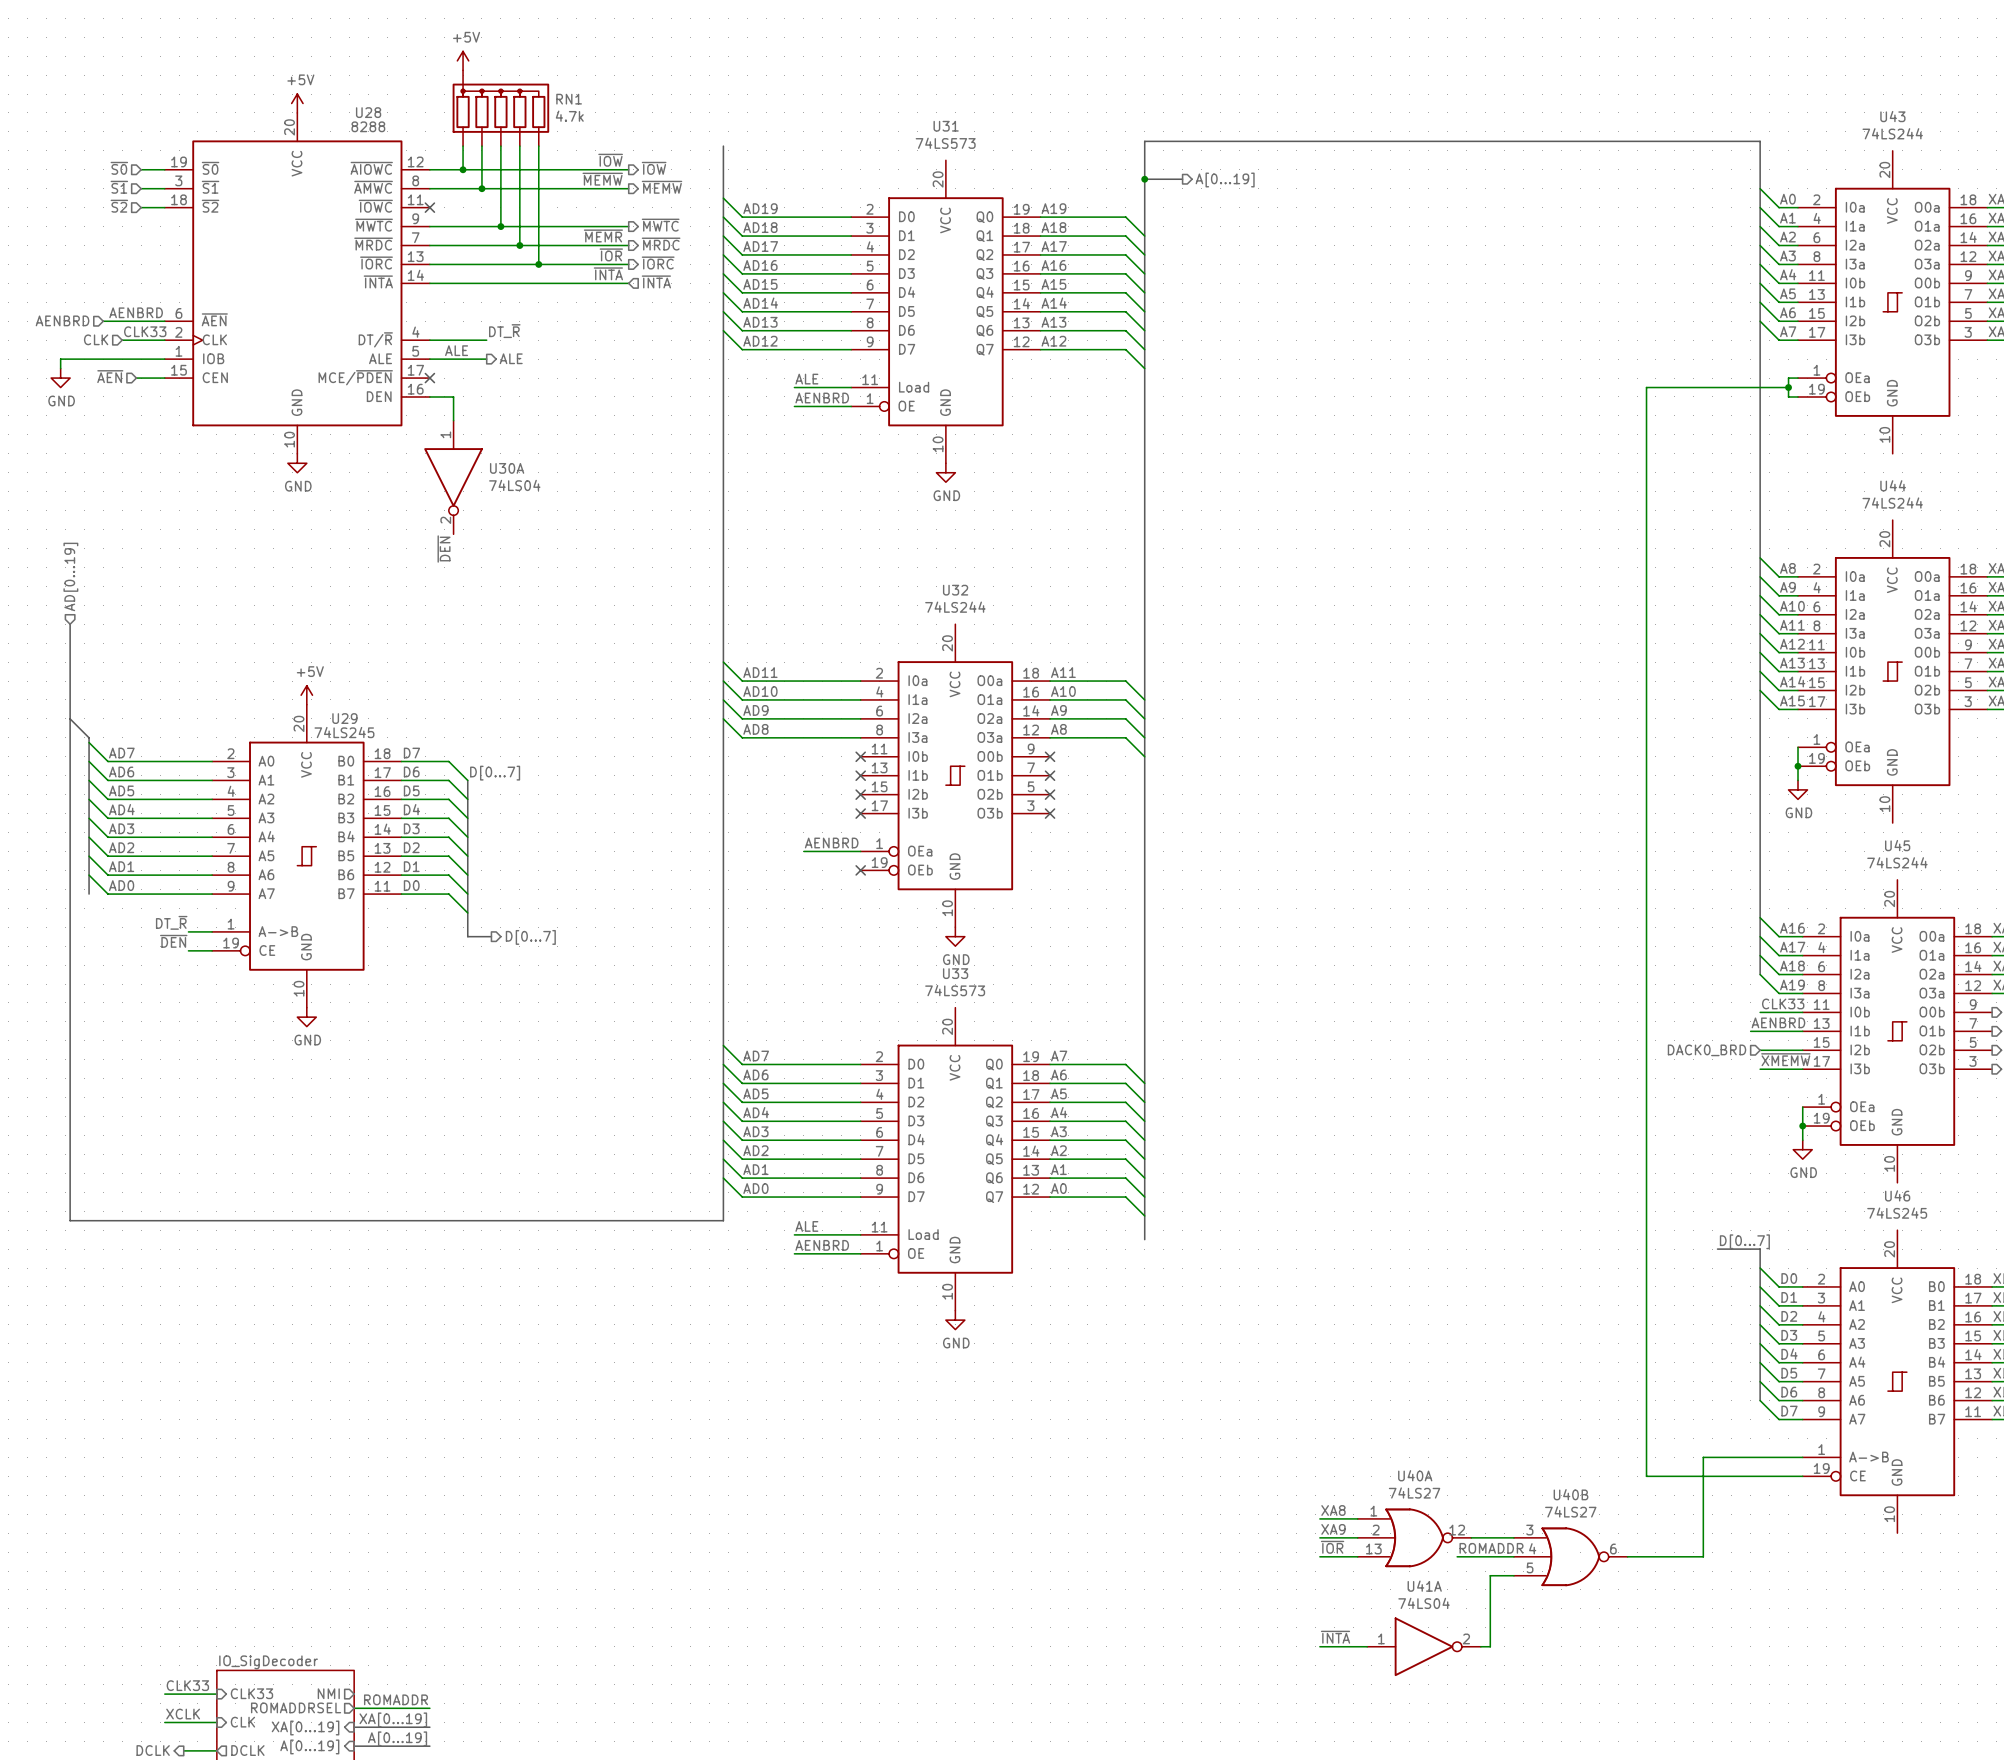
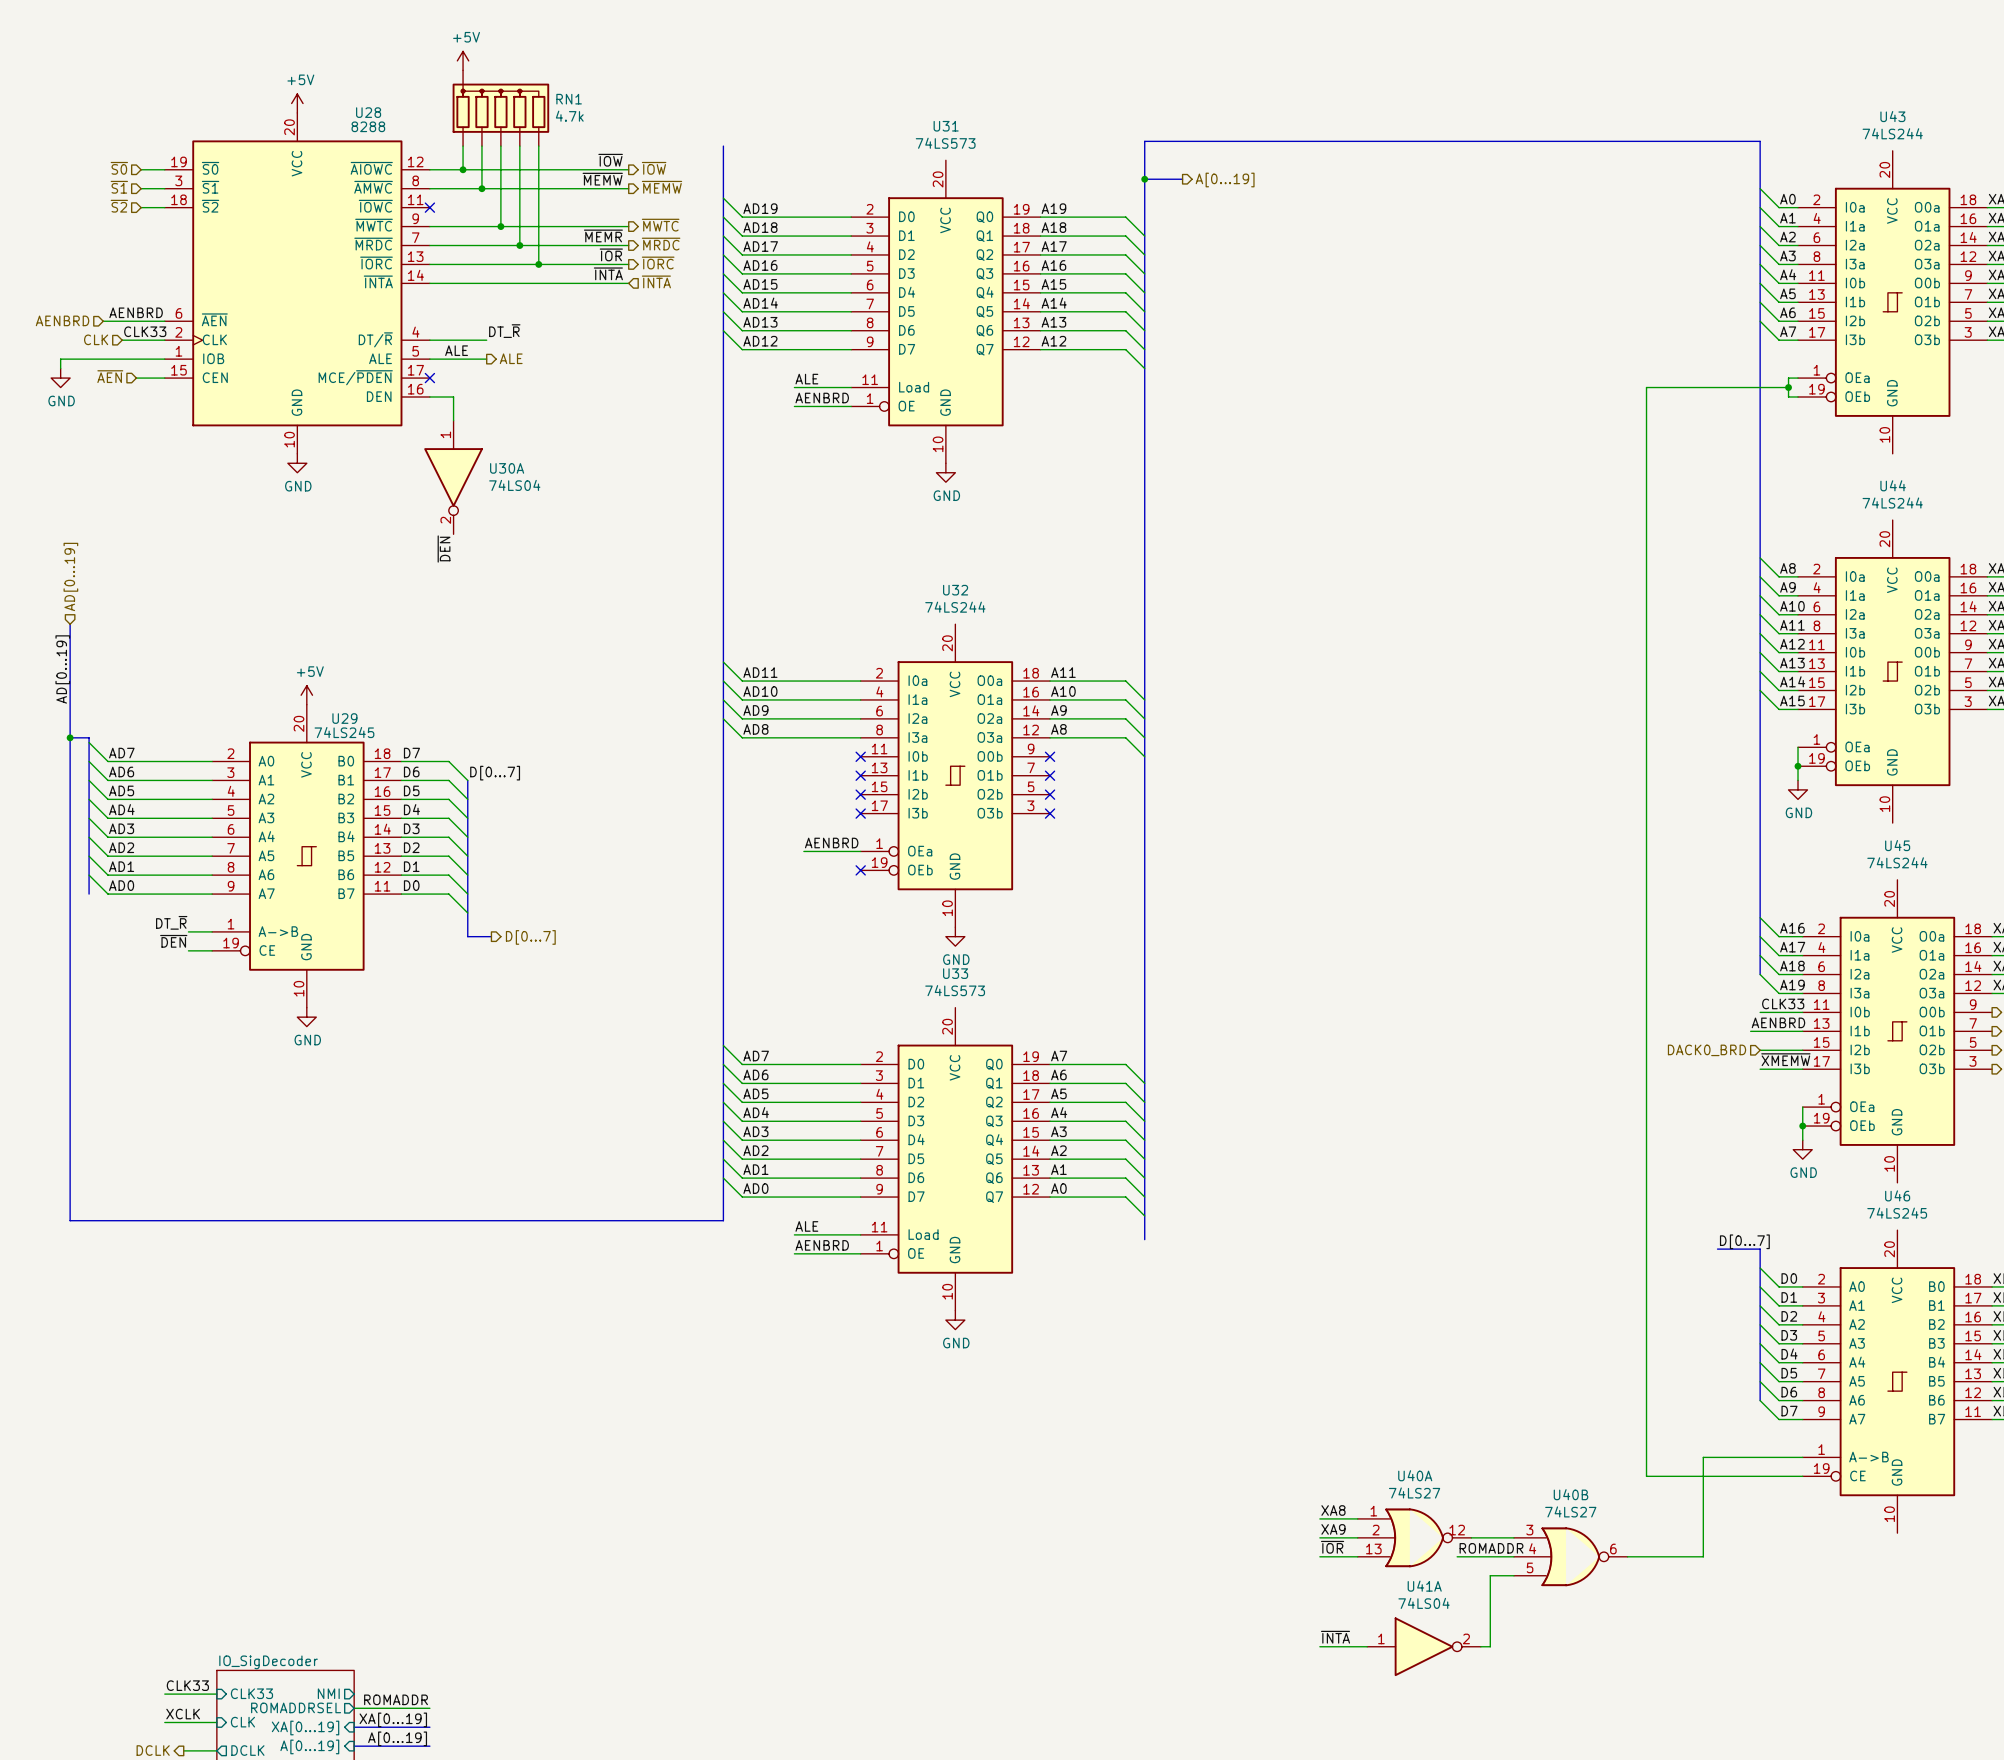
label: none -> AD[0...19] (62, 669)
bus: (70, 718) (89, 737) -> (70, 737) (89, 737)
junction: none -> (70, 737)

